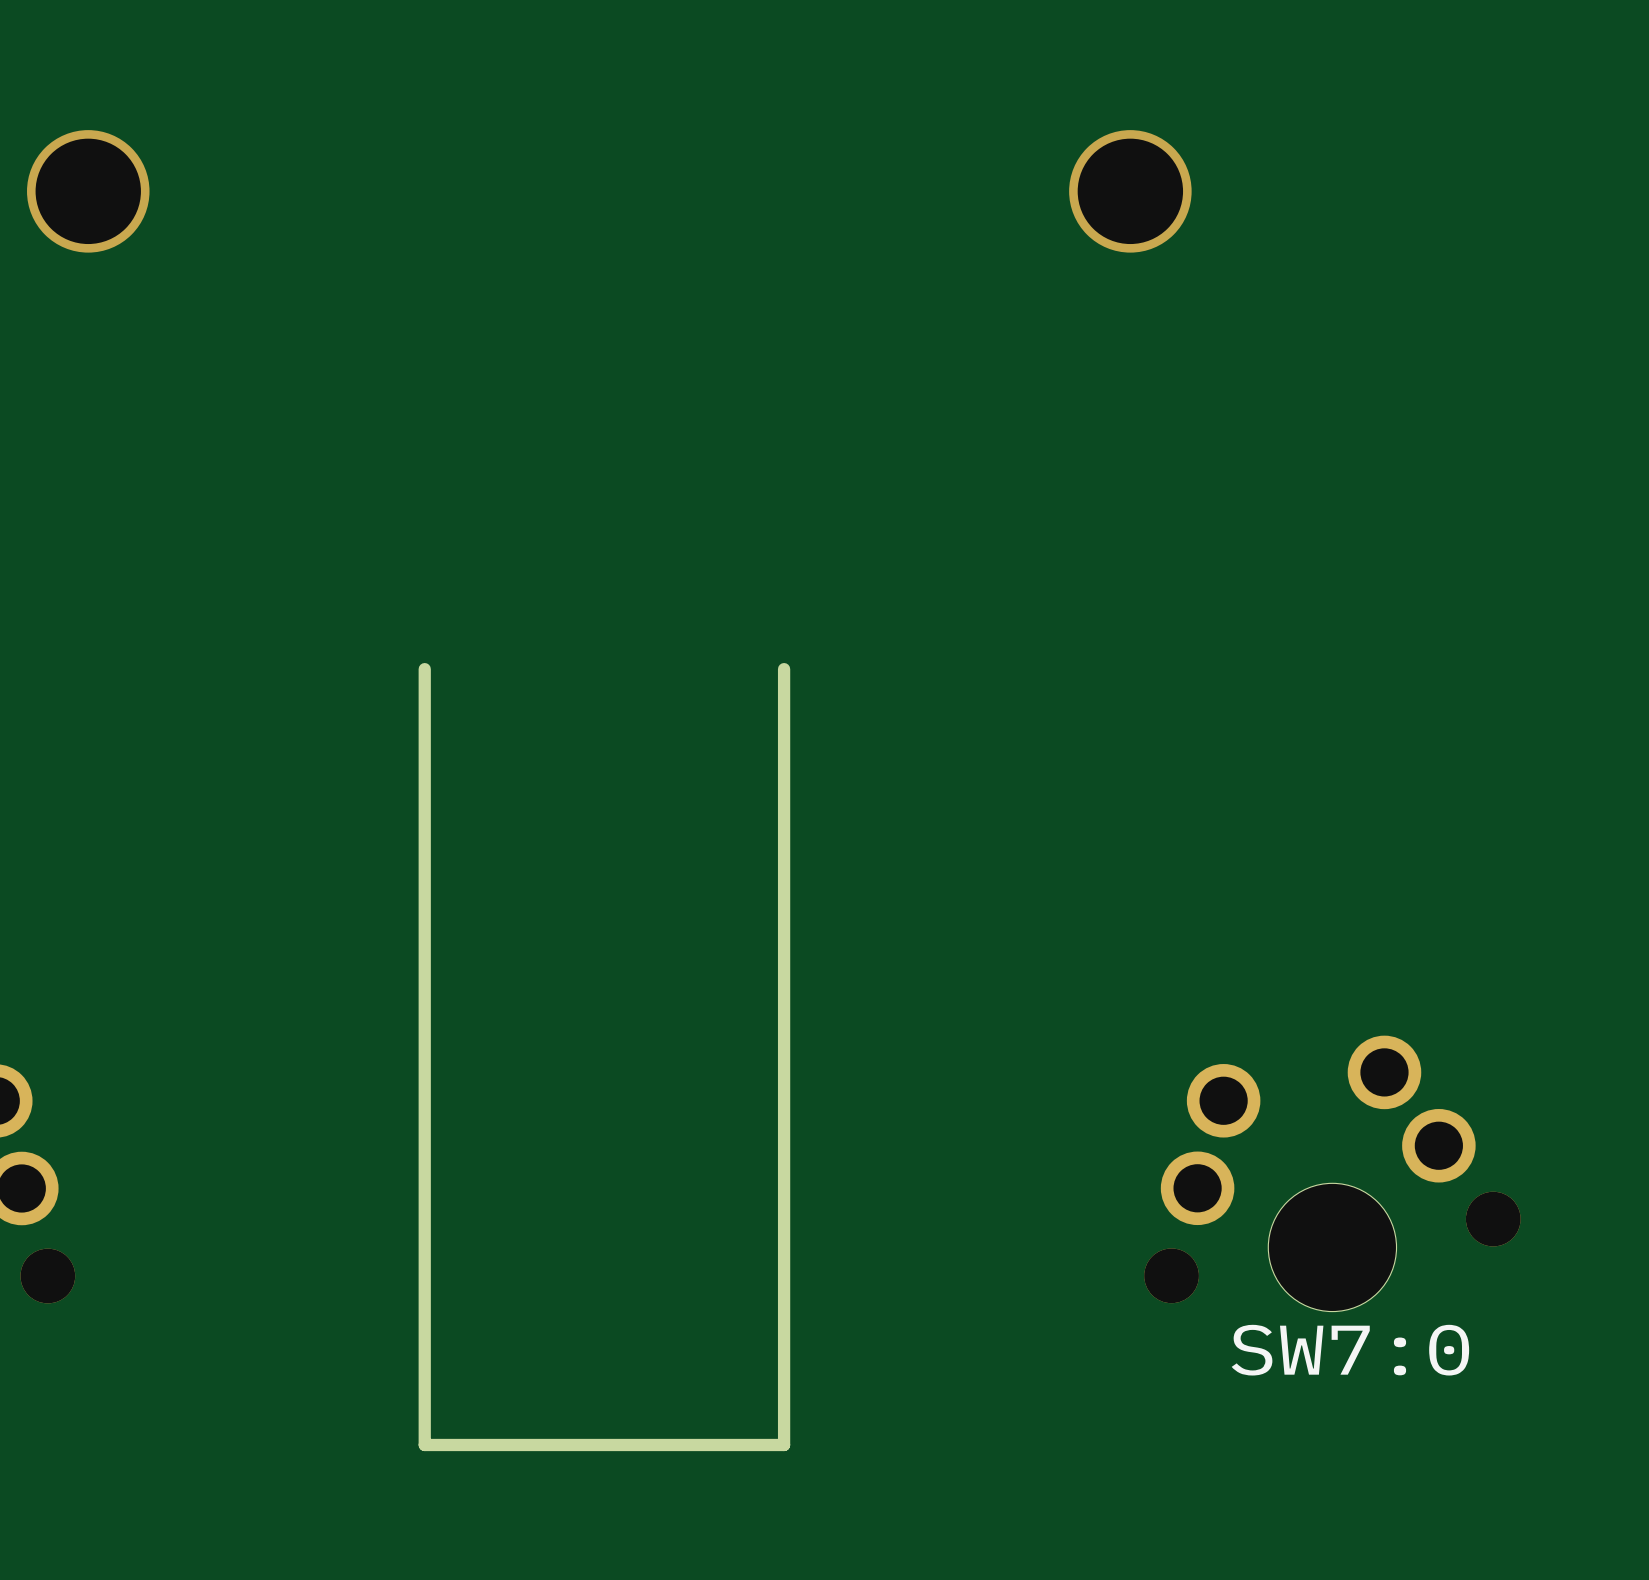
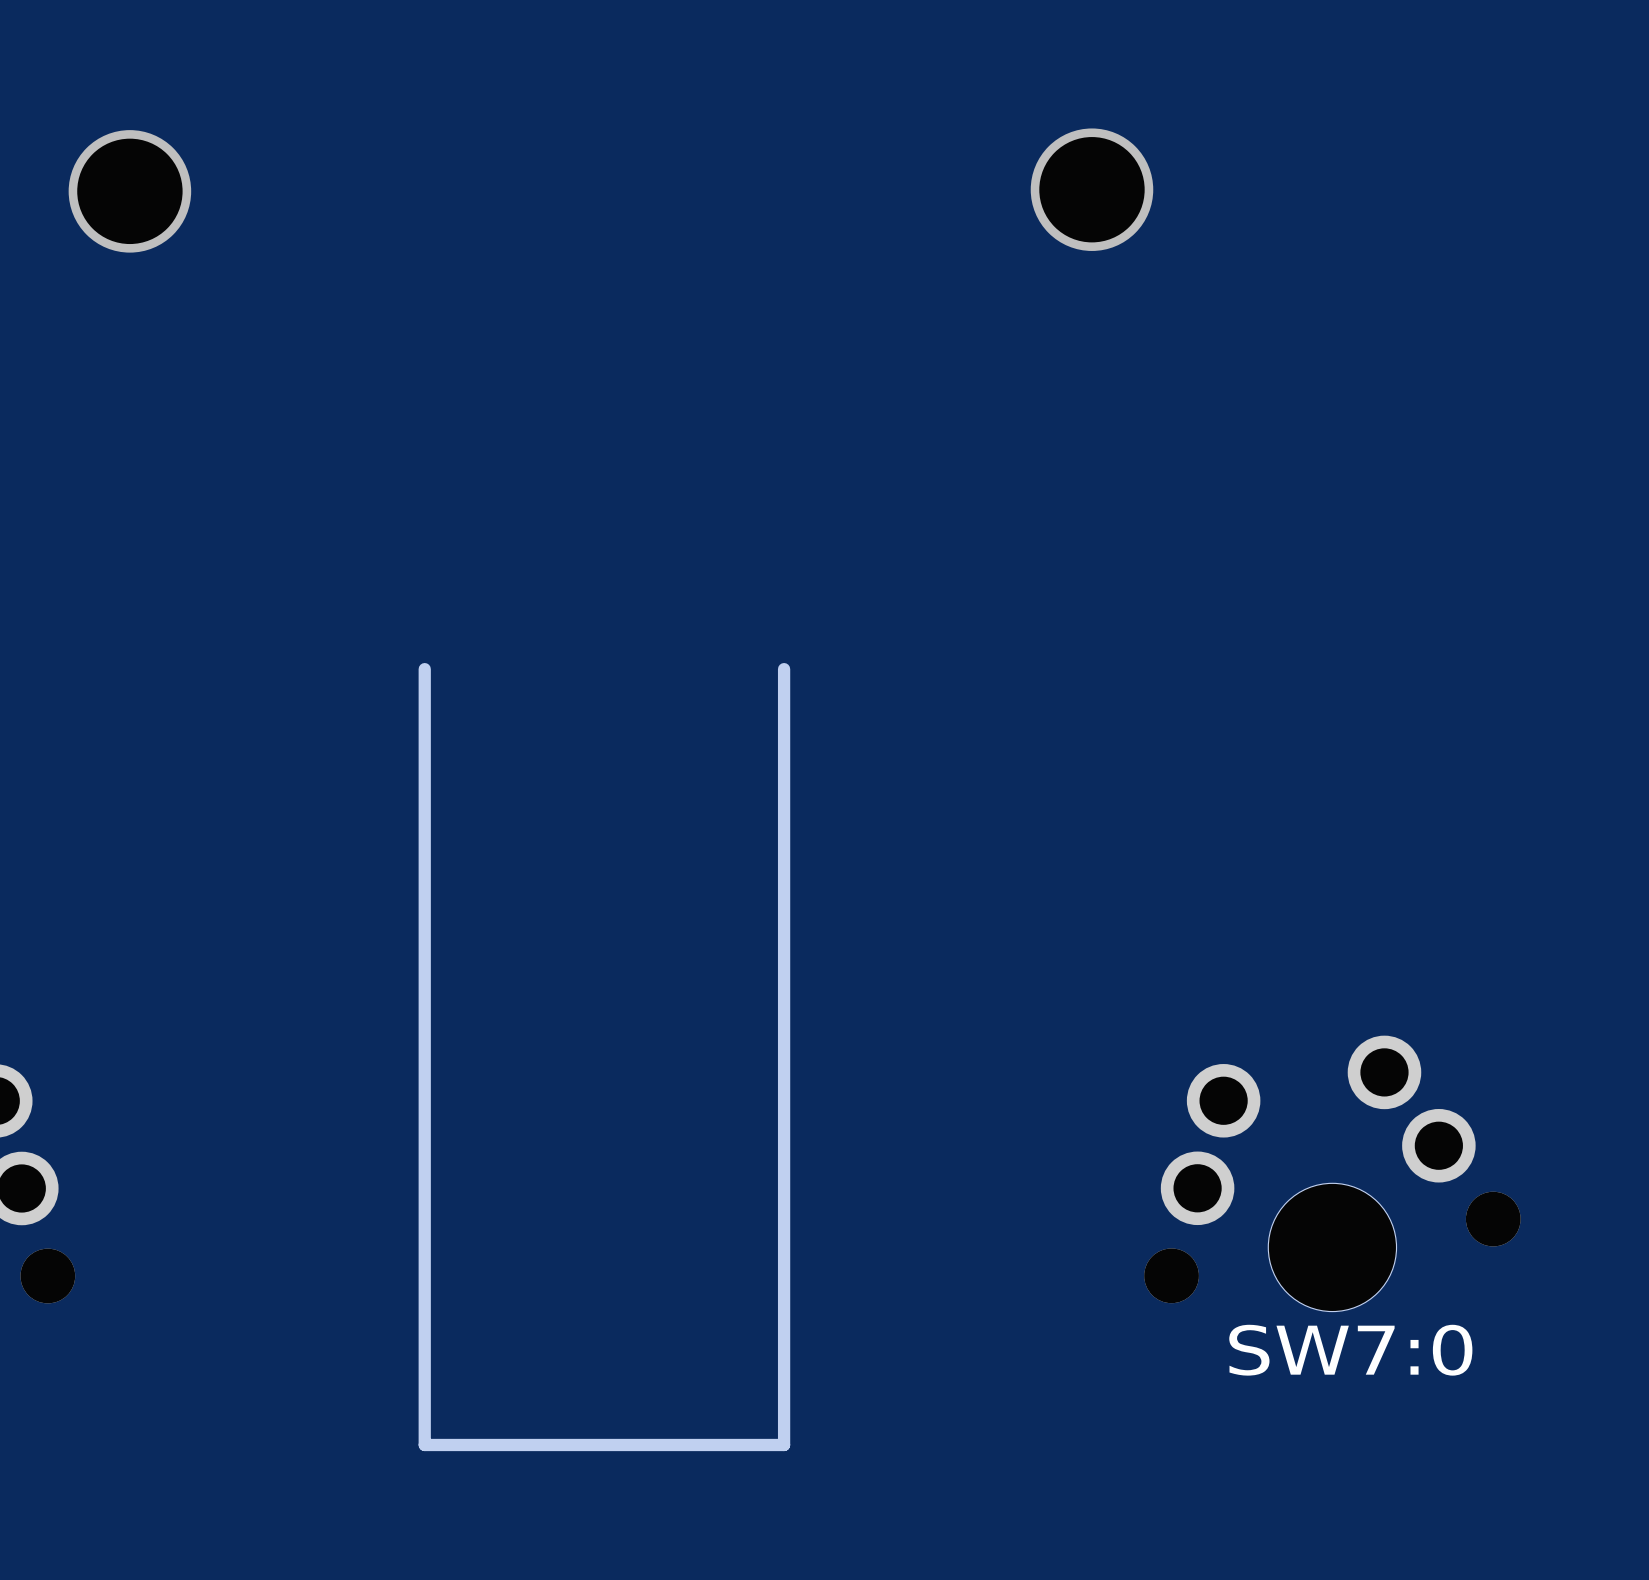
via position: (88, 191) -> (129, 191)
via position: (1130, 191) -> (1091, 189)

